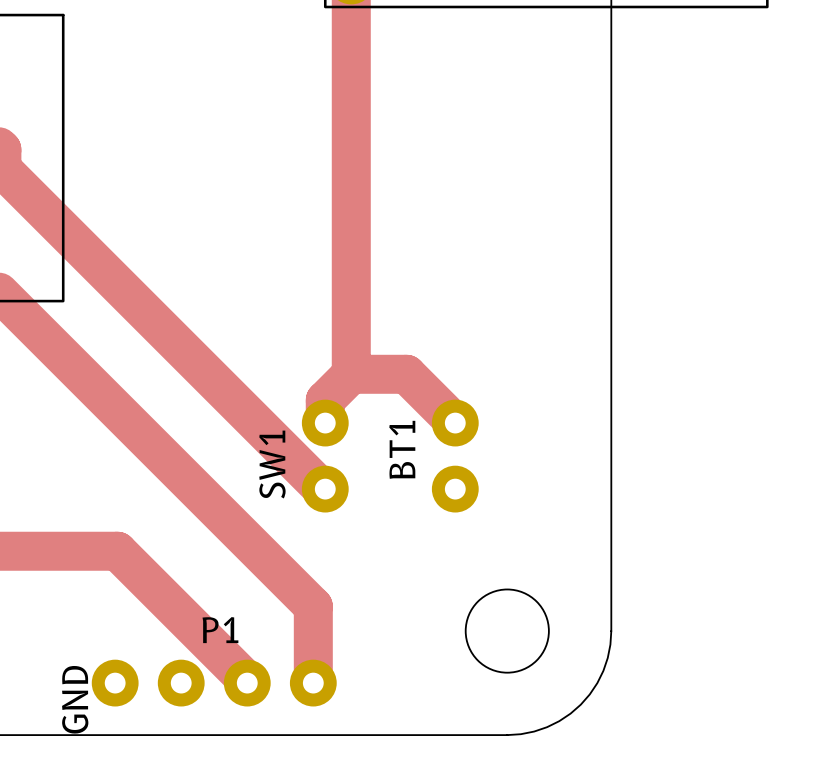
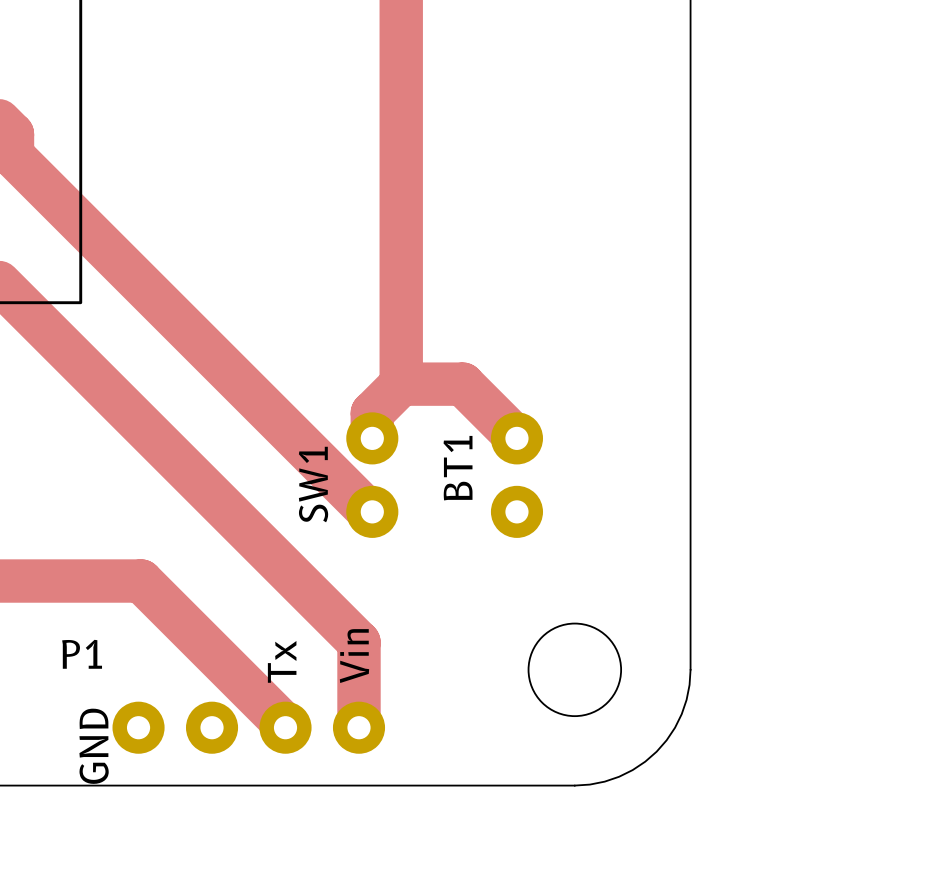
text: none -> Vin (354, 656)
text: none -> Tx (282, 661)
P1 name position: P1 (220, 630) -> P1 (82, 654)

